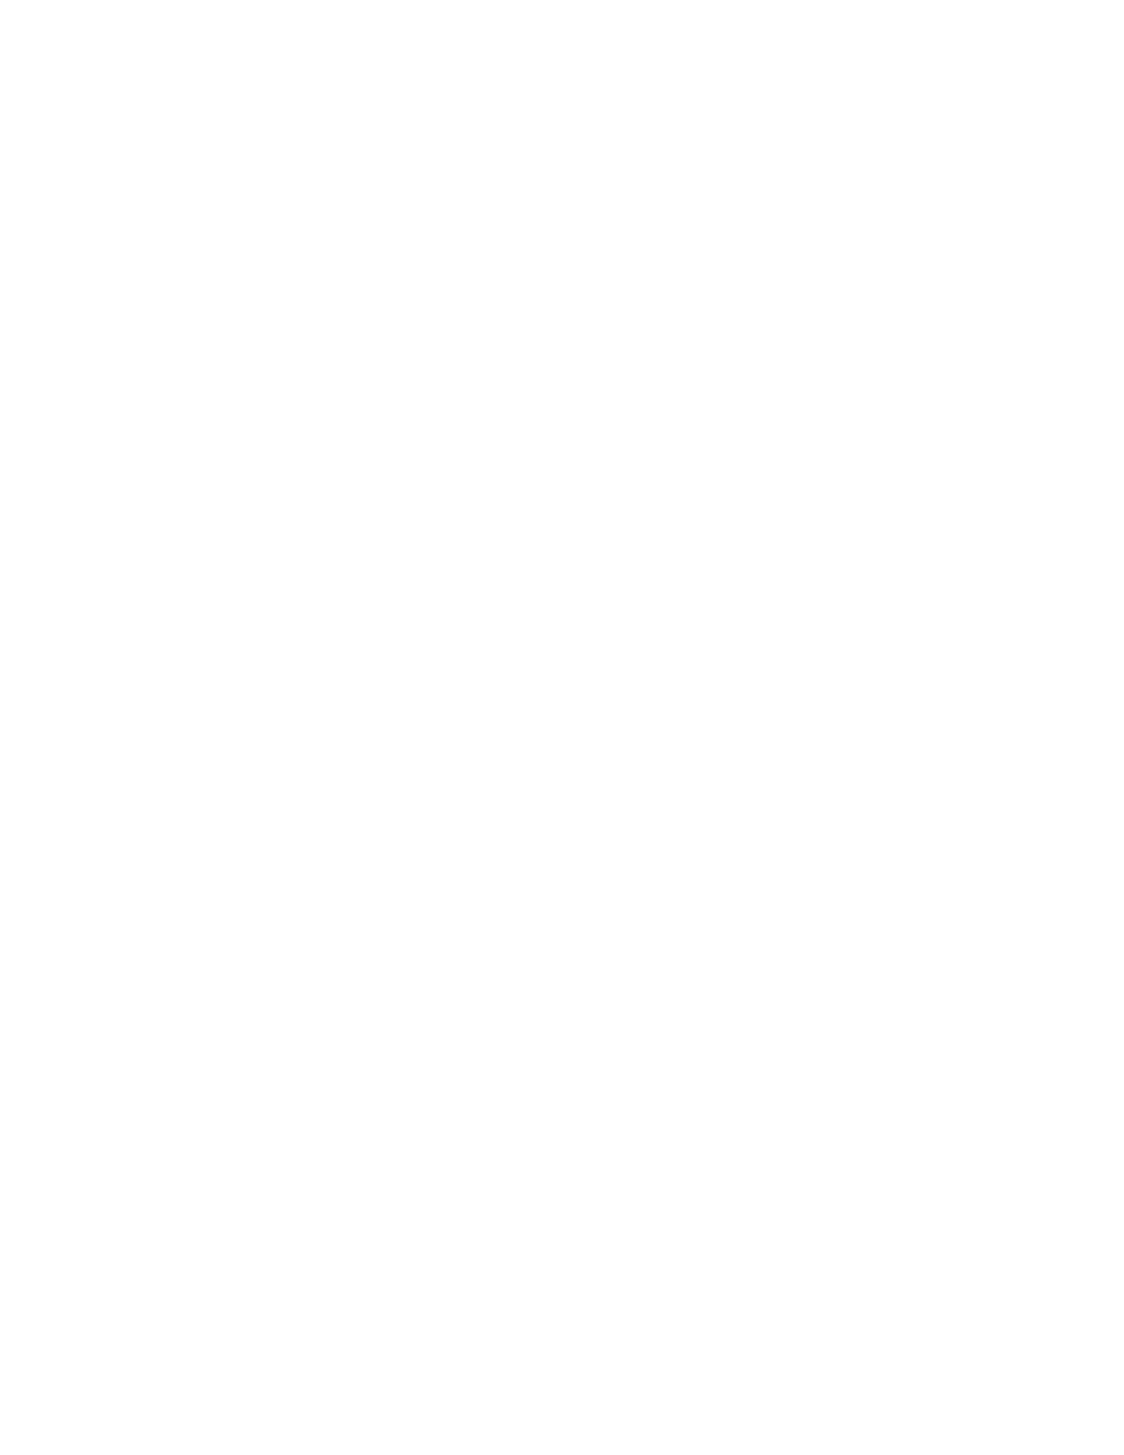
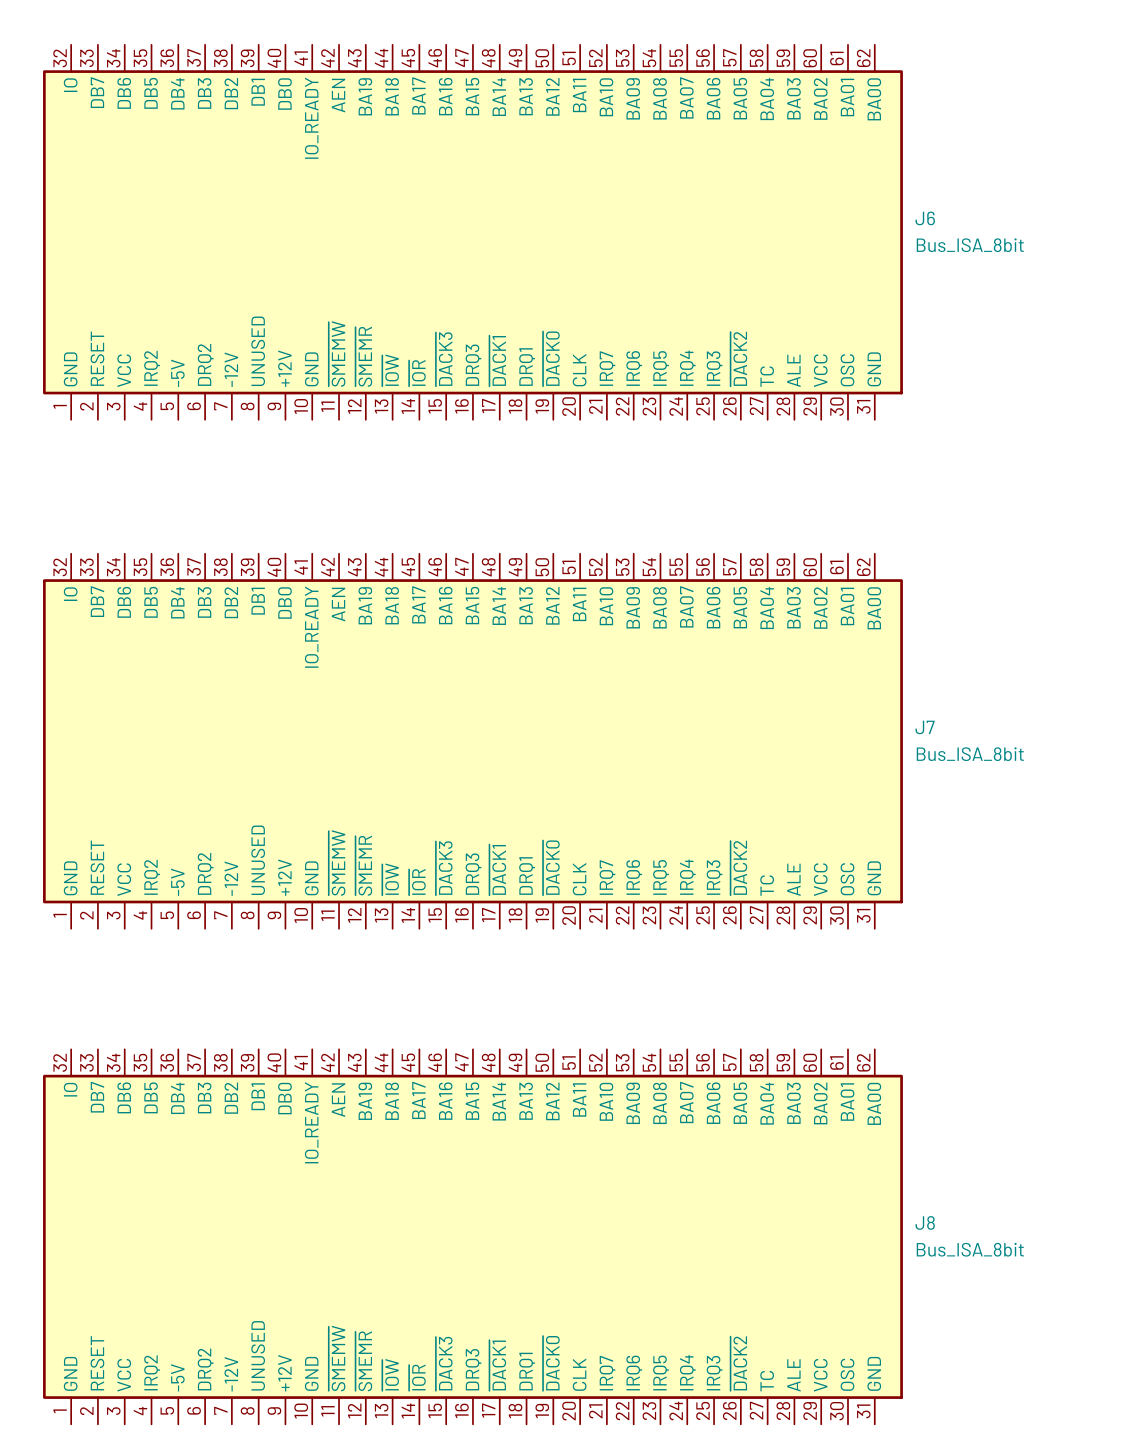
J6: none -> Bus_ISA_8bit (472, 232)
J7: none -> Bus_ISA_8bit (472, 741)
J8: none -> Bus_ISA_8bit (472, 1236)

